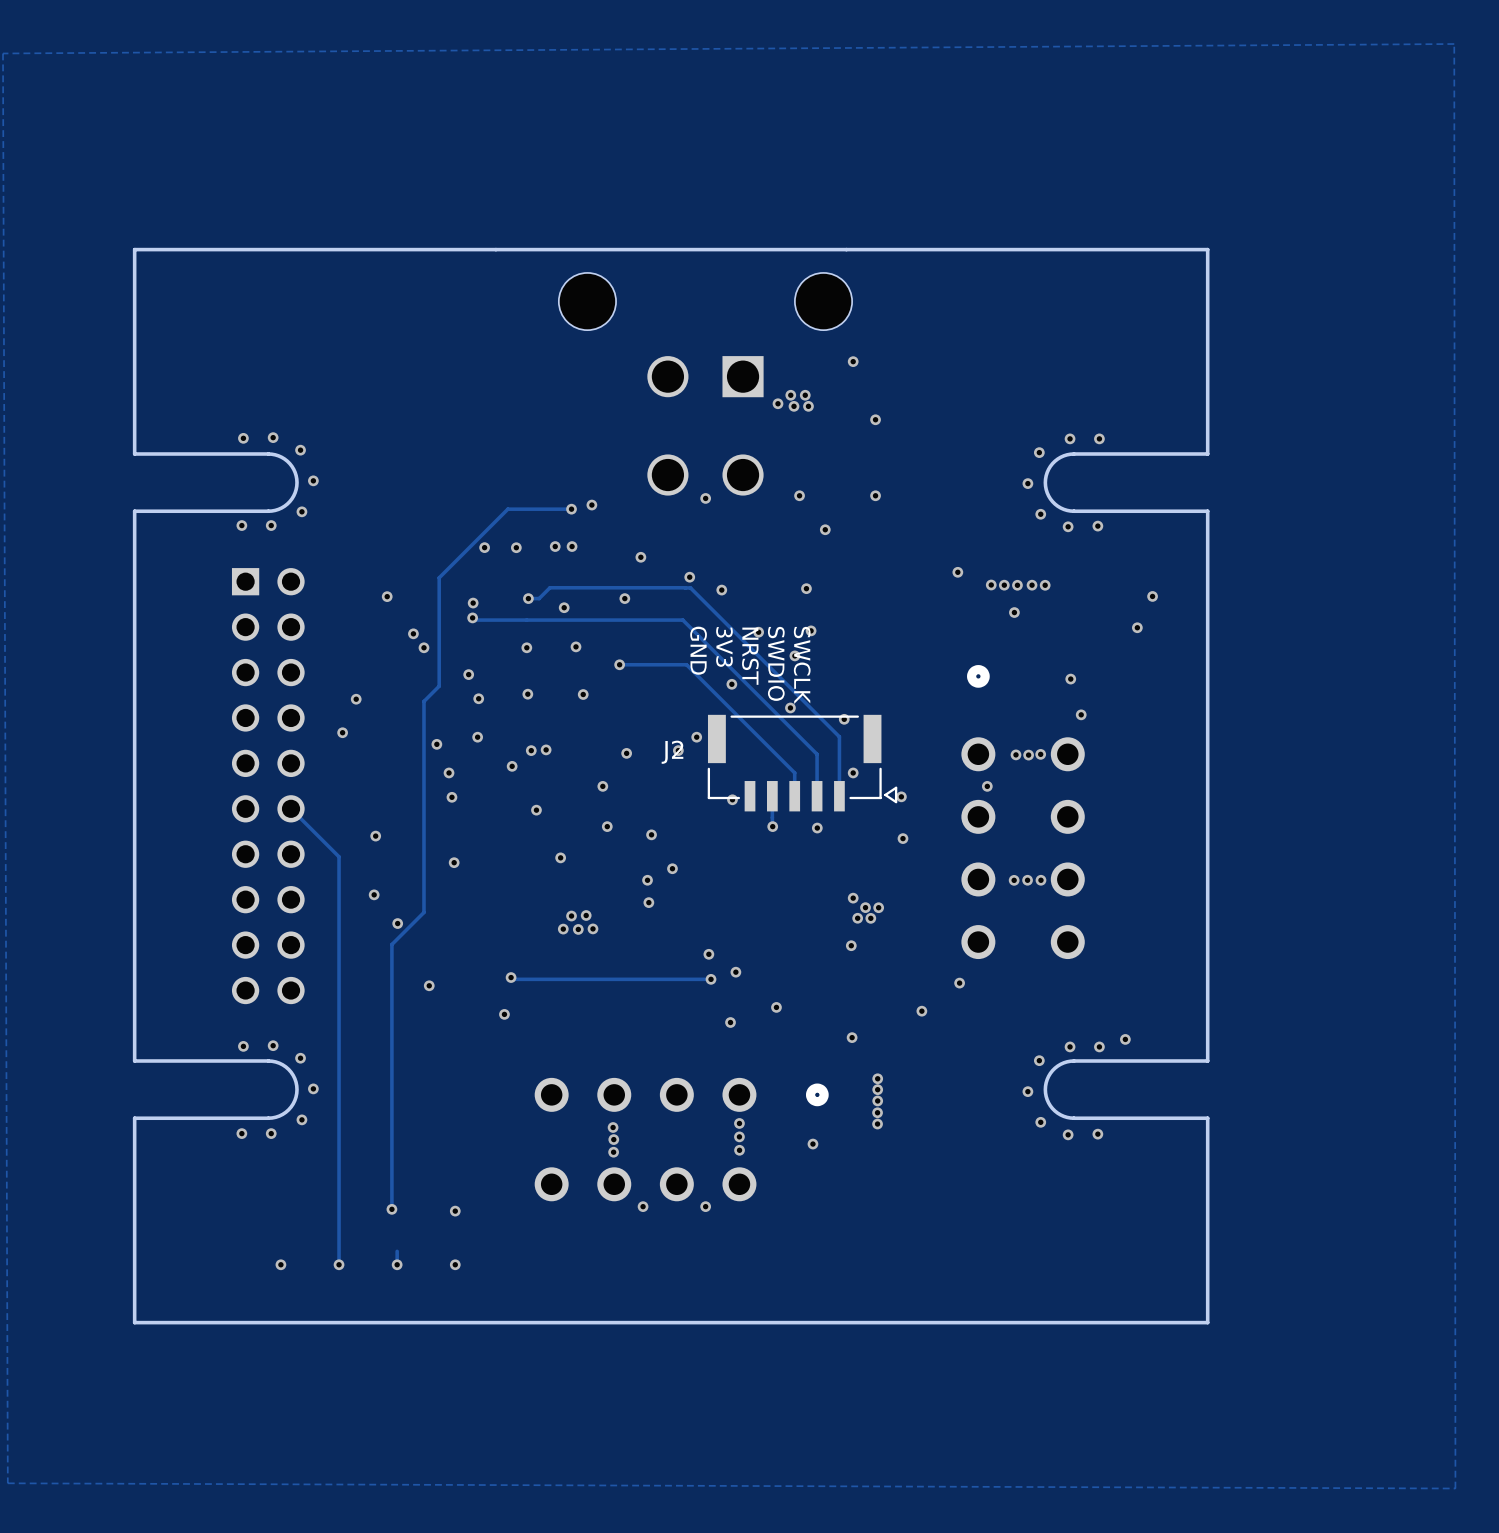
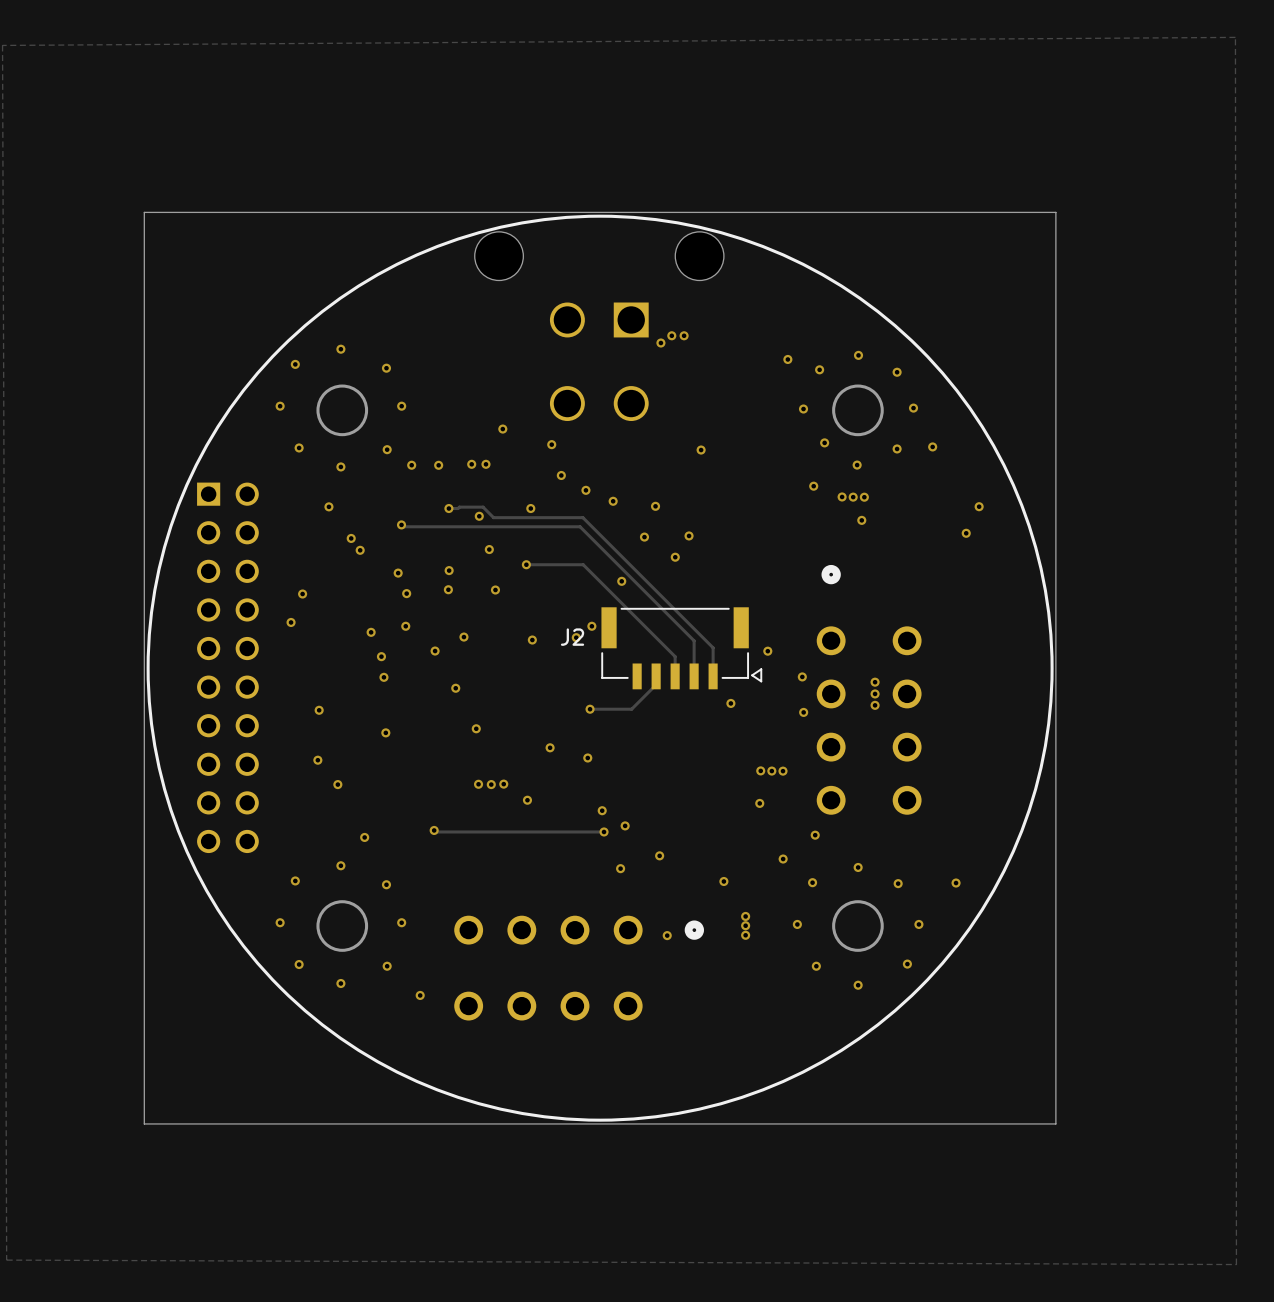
board edge: (1207, 249) (1207, 454) (1070, 454) (1060, 457) (1052, 463) (1047, 472) (1045, 482) (1047, 492) (1052, 501) (1060, 507) (1070, 511) (1207, 511) (1207, 1061) (1070, 1061) (1060, 1064) (1052, 1070) (1047, 1079) (1045, 1089) (1047, 1099) (1052, 1108) (1060, 1114) (1070, 1118) (1207, 1118) (1207, 1322) (134, 1322) (134, 1118) (272, 1117) (282, 1114) (291, 1107) (297, 1089) (291, 1072) (282, 1064) (272, 1061) (134, 1061) (134, 511) (271, 511) (281, 507) (289, 501) (295, 492) (297, 482) (295, 472) (289, 463) (281, 457) (271, 454) (134, 454) (134, 249) (1207, 249) -> (1055, 212) (1055, 1123) (144, 1123) (144, 212) (1055, 212)
drawing: none -> [146, 214, 1054, 1122]
via: (853, 361) -> none
via: (794, 406) -> none
via: (808, 406) -> none
via: none -> (340, 349)
via: none -> (858, 355)
via: (875, 419) -> none
via: none -> (787, 359)
via: none -> (295, 364)
via: none -> (386, 368)
via: none -> (819, 369)
via: (273, 437) -> none
via: (243, 438) -> none
via: none -> (897, 372)
via: (1070, 438) -> none
via: (1099, 438) -> none
via: (300, 450) -> none
round board edge: none -> [316, 384, 369, 437]
round board edge: none -> [832, 384, 884, 437]
via: (1039, 452) -> none
via: none -> (401, 406)
via position: (313, 480) -> (280, 406)
via: none -> (913, 408)
via: none -> (803, 409)
via: (1027, 483) -> none
via: (799, 495) -> none
via: (875, 495) -> none
via: (705, 498) -> none
track: (571, 509) (507, 509) (439, 577) (439, 686) (423, 701) (423, 912) (391, 944) (391, 1209) -> none
via: (571, 509) -> none
via: (301, 511) -> none
via: (1040, 514) -> none
via: none -> (824, 442)
via: none -> (551, 444)
via: (241, 525) -> none
via: (271, 525) -> none
via: (1068, 526) -> none
via: none -> (299, 447)
via: none -> (897, 448)
via: none -> (387, 449)
via: none -> (857, 465)
via: none -> (340, 466)
via: (640, 557) -> none
via: none -> (561, 475)
via: (1032, 585) -> none
via: (1045, 585) -> none
via position: (806, 588) -> (655, 506)
track: (540, 596) (549, 587) (690, 587) (839, 736) (839, 762) -> (459, 507) (483, 507) (493, 517) (582, 517) (713, 647)
via: (473, 603) -> none
text: 3V3 (724, 646) -> none
via position: (526, 647) -> (449, 570)
text: GND (698, 650) -> none
text: NRST (750, 656) -> none
text: SWDIO (776, 663) -> none
text: SWCLK (802, 665) -> none
via: (1070, 679) -> none
via: (790, 707) -> none
via: (1081, 714) -> none
via: (844, 719) -> none
via: (531, 750) -> none
via: (1015, 754) -> none
via: (1040, 754) -> none
via: (1028, 755) -> none
via: none -> (767, 651)
via: (853, 772) -> none
via: (602, 786) -> none
via: (987, 786) -> none
via: (901, 796) -> none
via: none -> (802, 676)
via: (732, 799) -> none
via: none -> (875, 682)
track: (772, 806) (772, 826) -> (656, 684) (631, 709) (590, 709)
track: (291, 808) (339, 856) (339, 1264) -> none
via: none -> (875, 693)
via: (607, 826) -> none
via: (772, 826) -> none
via: (817, 828) -> none
via: none -> (730, 703)
via: none -> (875, 705)
via: (651, 834) -> none
via: none -> (590, 709)
via: (902, 838) -> none
via: none -> (803, 712)
via: (672, 868) -> none
via: (1014, 880) -> none
via: (1027, 880) -> none
via: (1040, 880) -> none
via: none -> (587, 757)
via: (853, 898) -> none
via: (648, 902) -> none
via: (865, 907) -> none
via: (878, 907) -> none
via: none -> (760, 770)
via: none -> (771, 771)
via: none -> (783, 771)
via: (586, 915) -> none
via: (571, 916) -> none
via: (857, 918) -> none
via: (870, 918) -> none
via: none -> (478, 784)
via: none -> (491, 784)
via: none -> (503, 784)
via: (592, 928) -> none
via: (563, 929) -> none
via: (578, 929) -> none
via: none -> (527, 800)
via: (851, 945) -> none
via: none -> (759, 803)
via: (504, 1014) -> none
via: none -> (340, 865)
via: none -> (858, 867)
via: none -> (295, 880)
via: none -> (812, 882)
via: none -> (898, 883)
via: none -> (386, 884)
via: (273, 1045) -> none
via: (243, 1046) -> none
via: (1070, 1046) -> none
via: (1099, 1046) -> none
via: (300, 1058) -> none
round board edge: none -> [316, 900, 369, 952]
round board edge: none -> [832, 900, 884, 952]
via: (1039, 1060) -> none
via: none -> (401, 922)
via position: (313, 1088) -> (280, 922)
via: none -> (797, 924)
via: none -> (918, 924)
via: (1027, 1091) -> none
via: none -> (667, 935)
via: (877, 1112) -> none
via: (301, 1119) -> none
via: (1040, 1122) -> none
via: (739, 1123) -> none
via: (877, 1124) -> none
via: (613, 1127) -> none
via: (241, 1133) -> none
via: (271, 1133) -> none
via: (1097, 1134) -> none
via: none -> (299, 964)
via: (739, 1136) -> none
via: none -> (387, 966)
via: none -> (816, 966)
via: (613, 1139) -> none
via: (812, 1144) -> none
via: (739, 1150) -> none
via: (613, 1152) -> none
via: none -> (340, 983)
via: none -> (858, 985)
via: none -> (420, 995)
via: (643, 1206) -> none
via: (705, 1206) -> none
via: (391, 1209) -> none
via: (455, 1211) -> none
track: (397, 1251) (397, 1264) -> none
via: (280, 1264) -> none
via: (339, 1264) -> none
via: (397, 1264) -> none
via: (455, 1264) -> none

